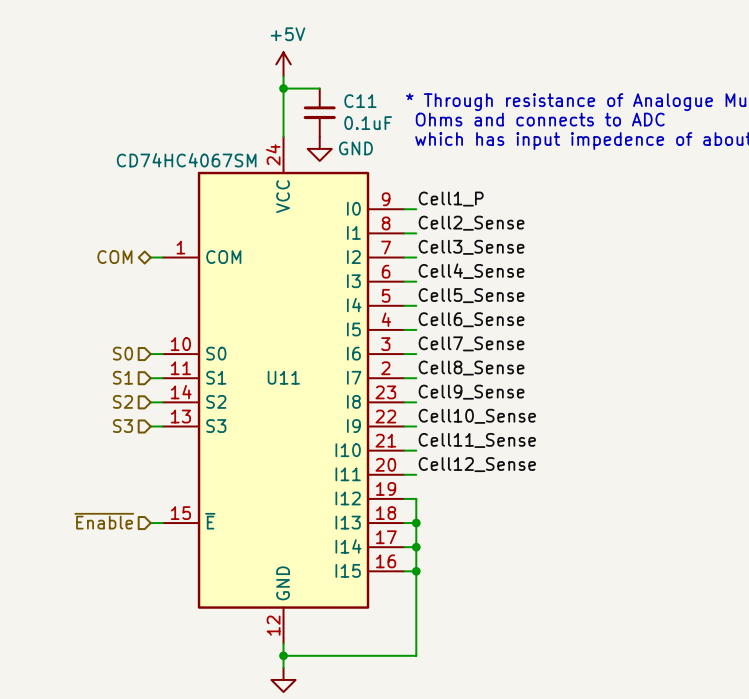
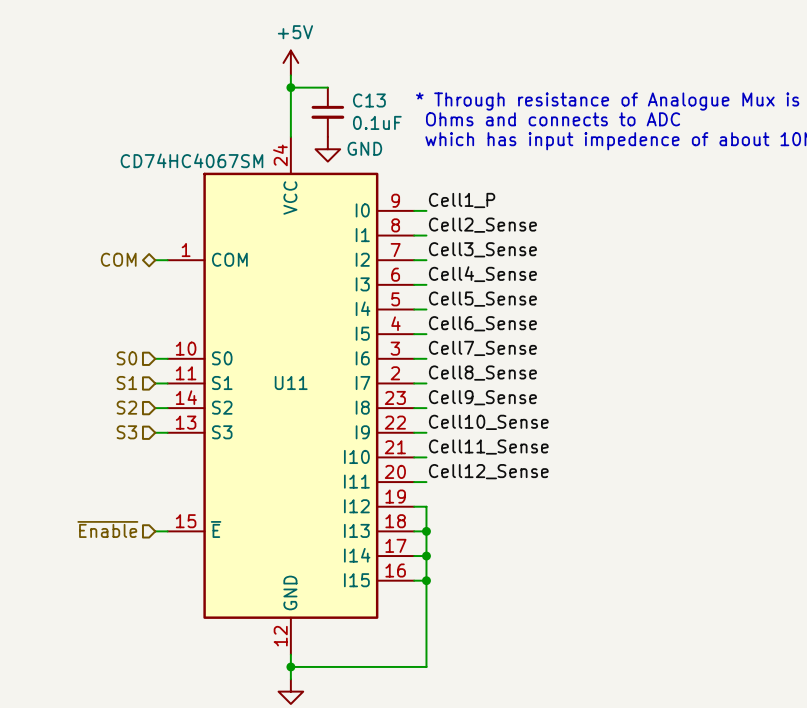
C11 name: C11 (360, 101) -> C13 (369, 100)

